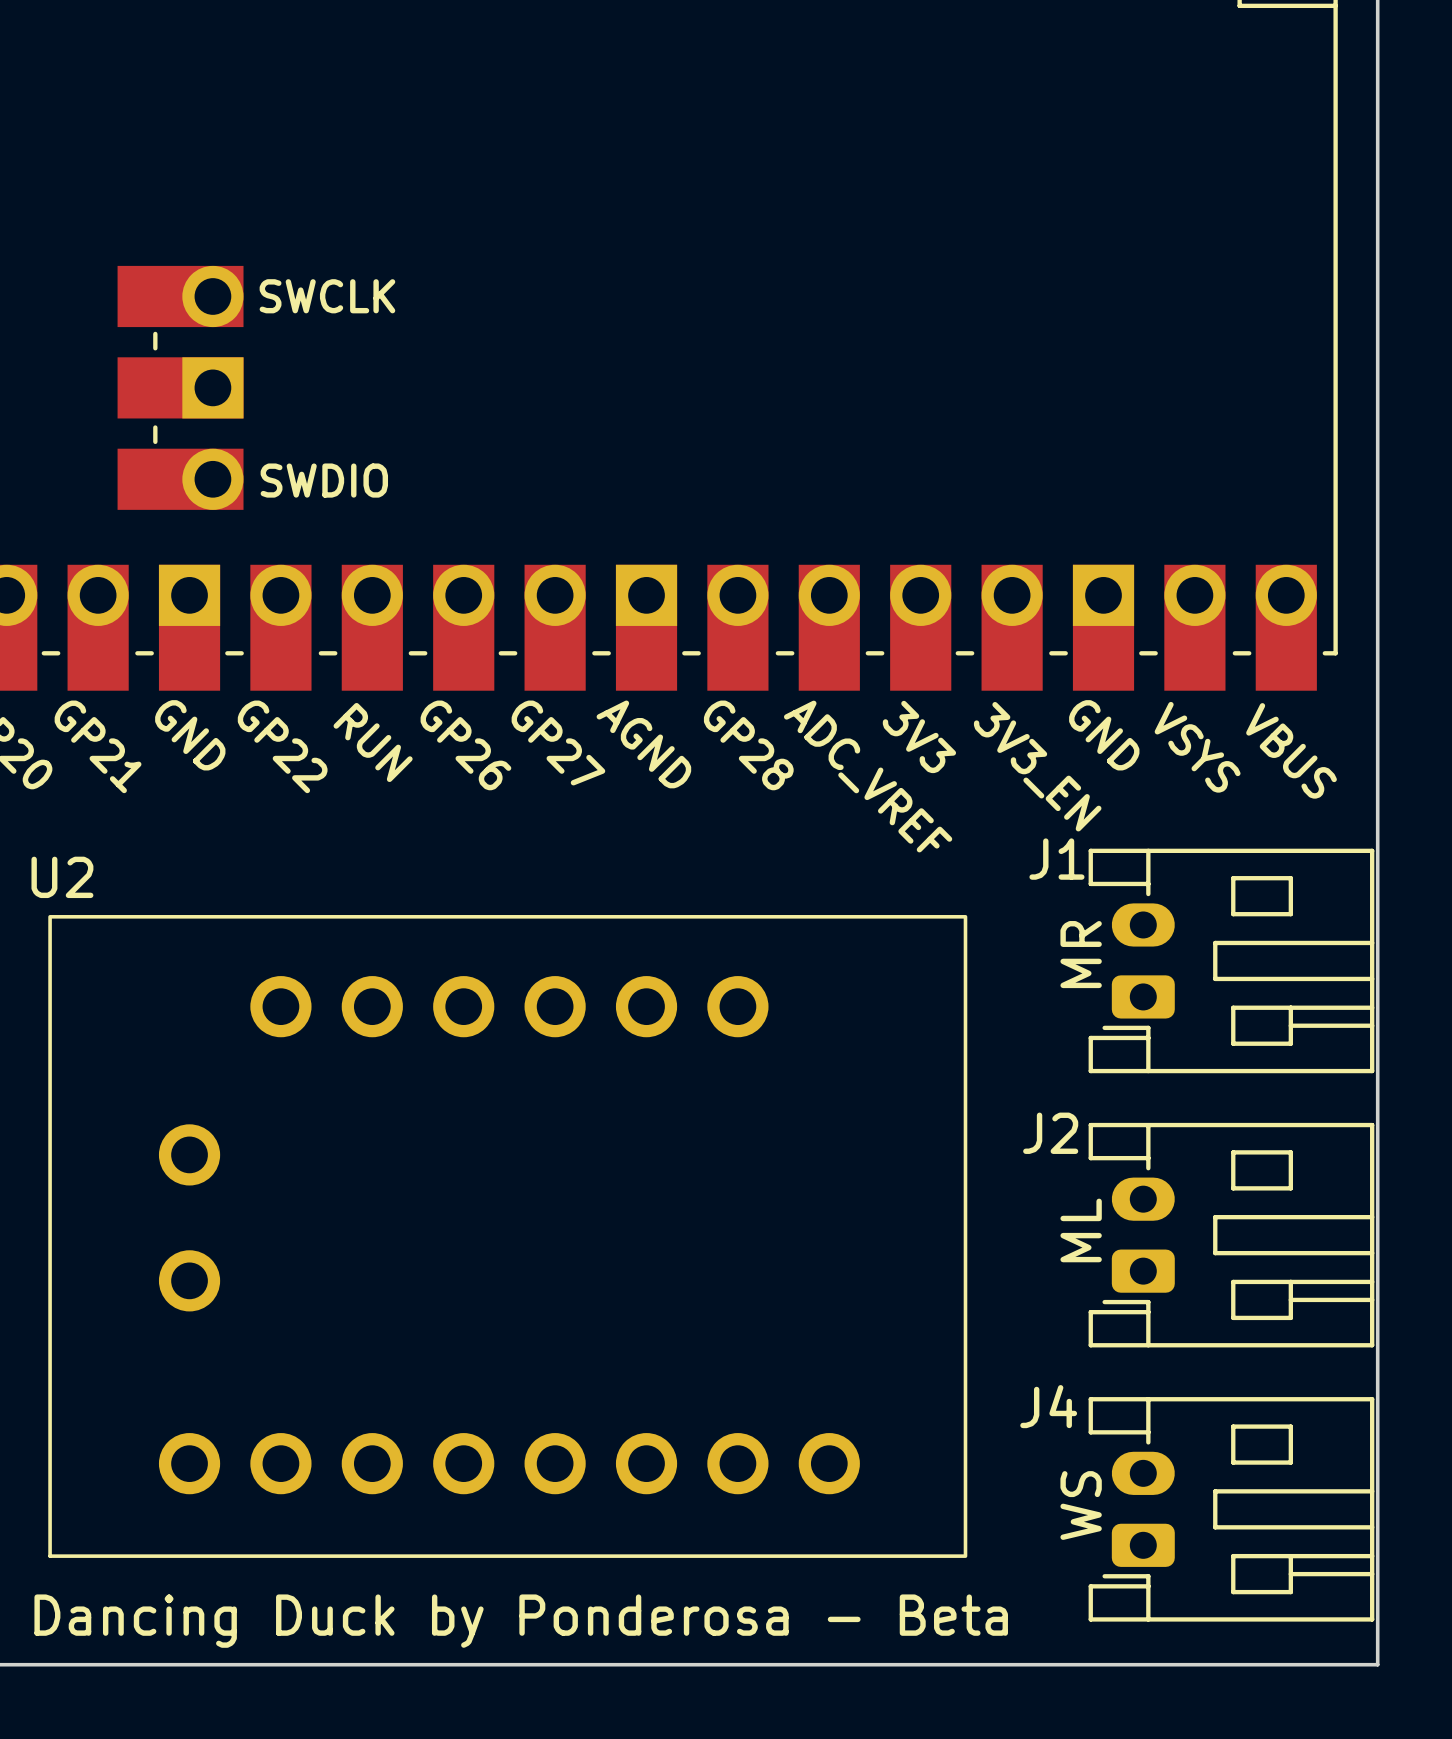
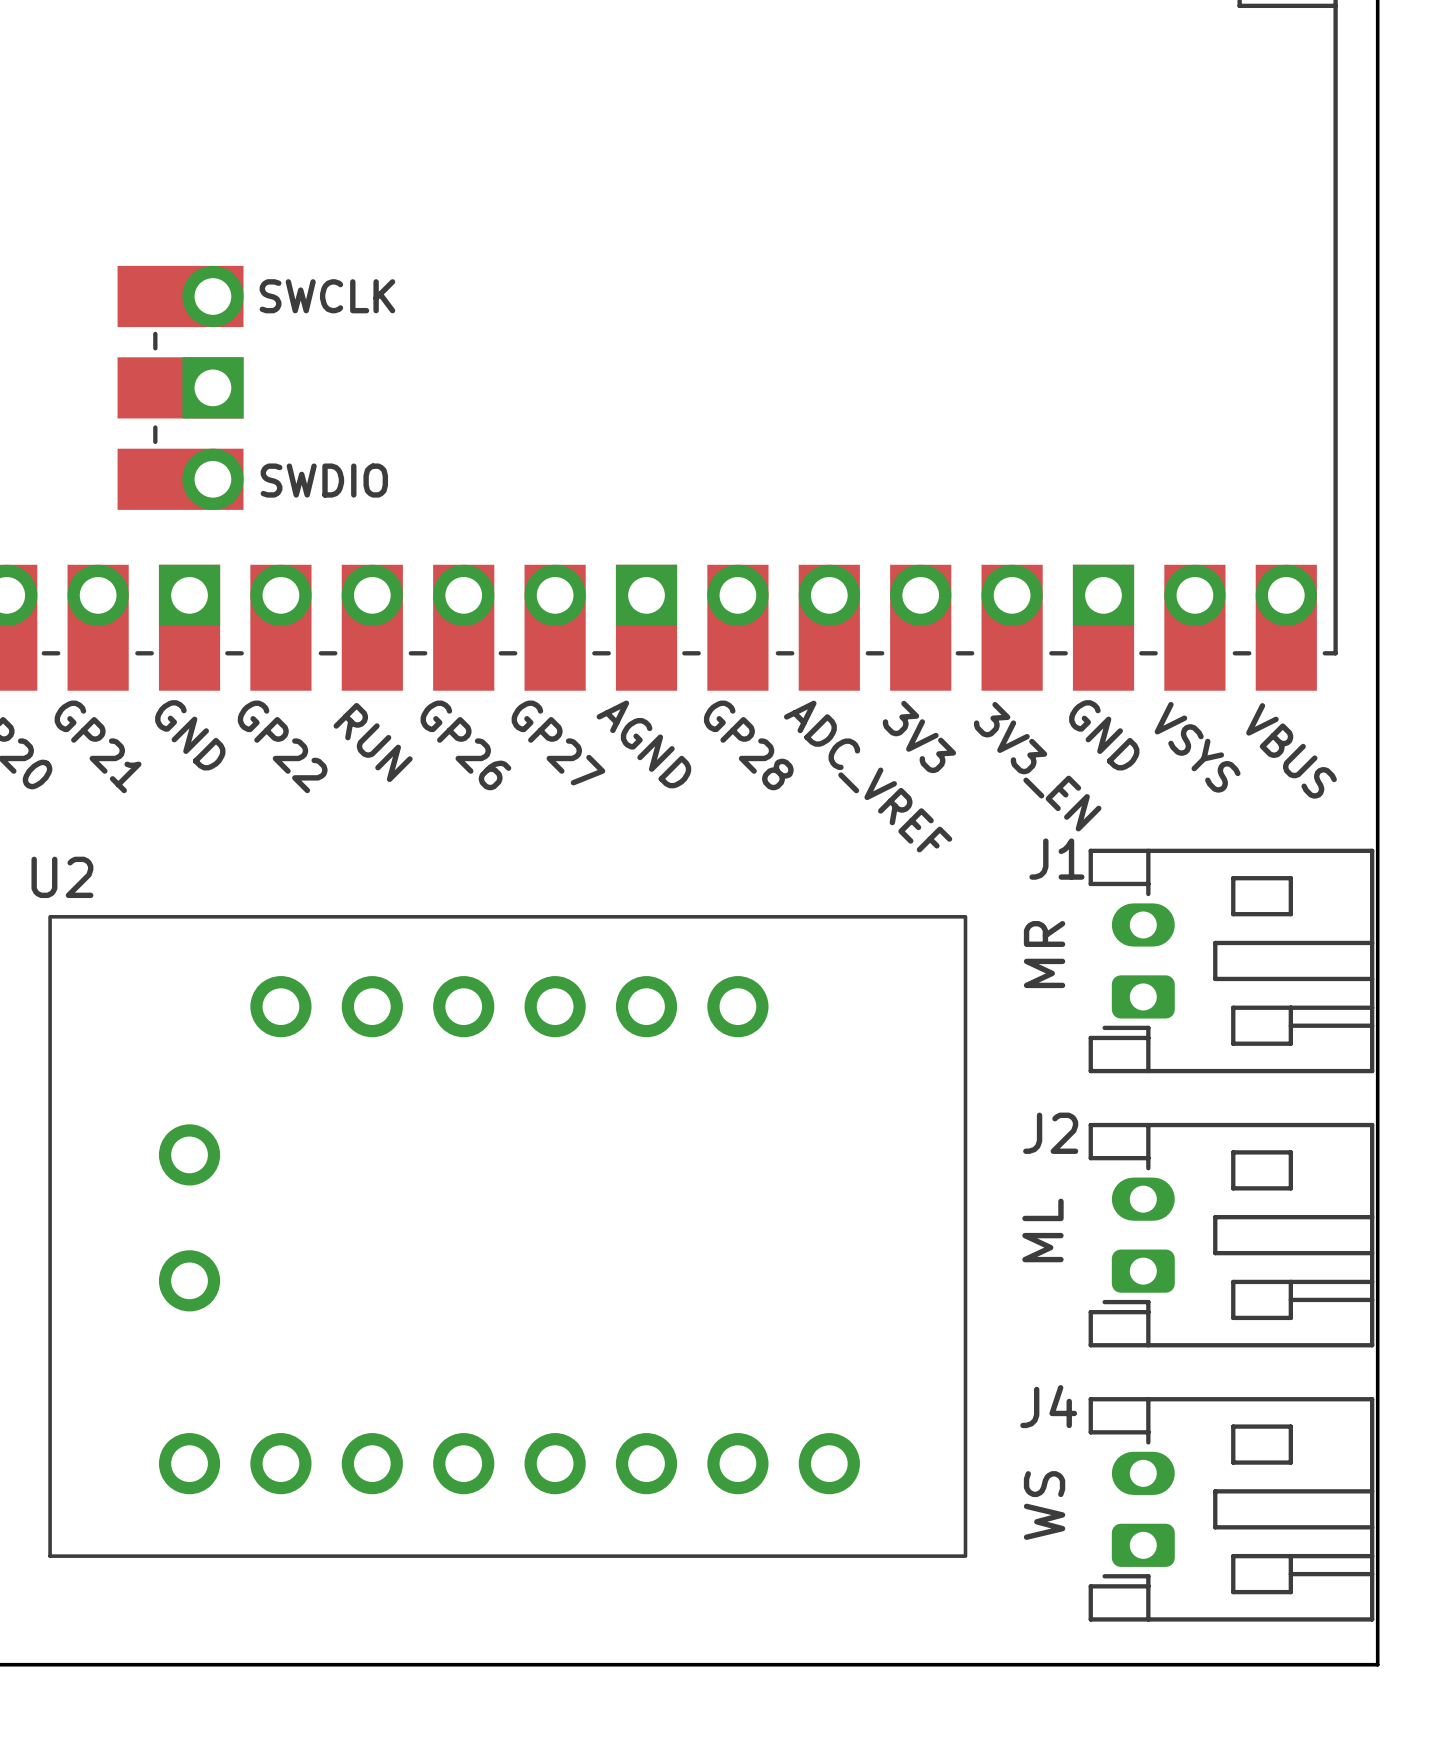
text position: MR (1081, 954) -> MR (1044, 954)
text position: ML (1081, 1230) -> ML (1042, 1230)
text position: WS (1081, 1505) -> WS (1044, 1505)
text: Dancing Duck by Ponderosa - Beta (521, 1621) -> none

